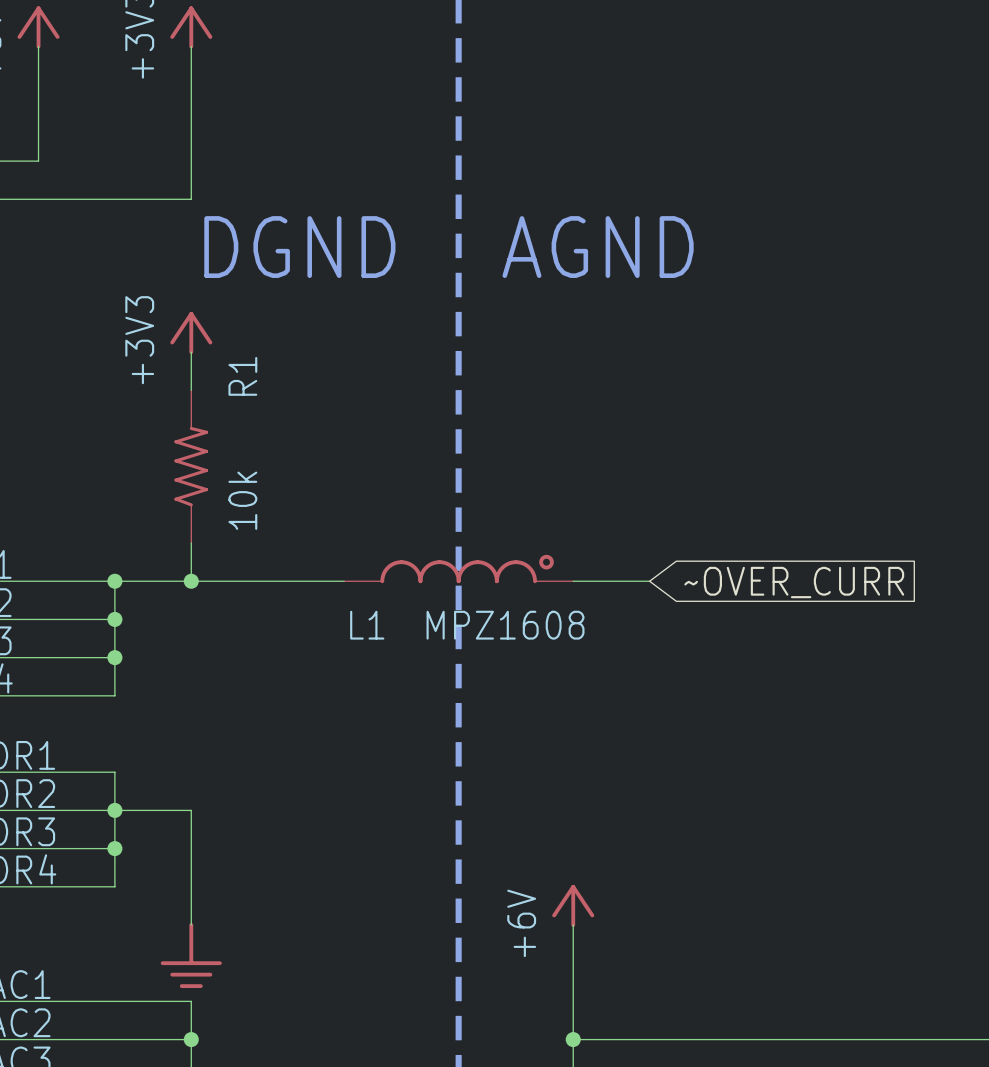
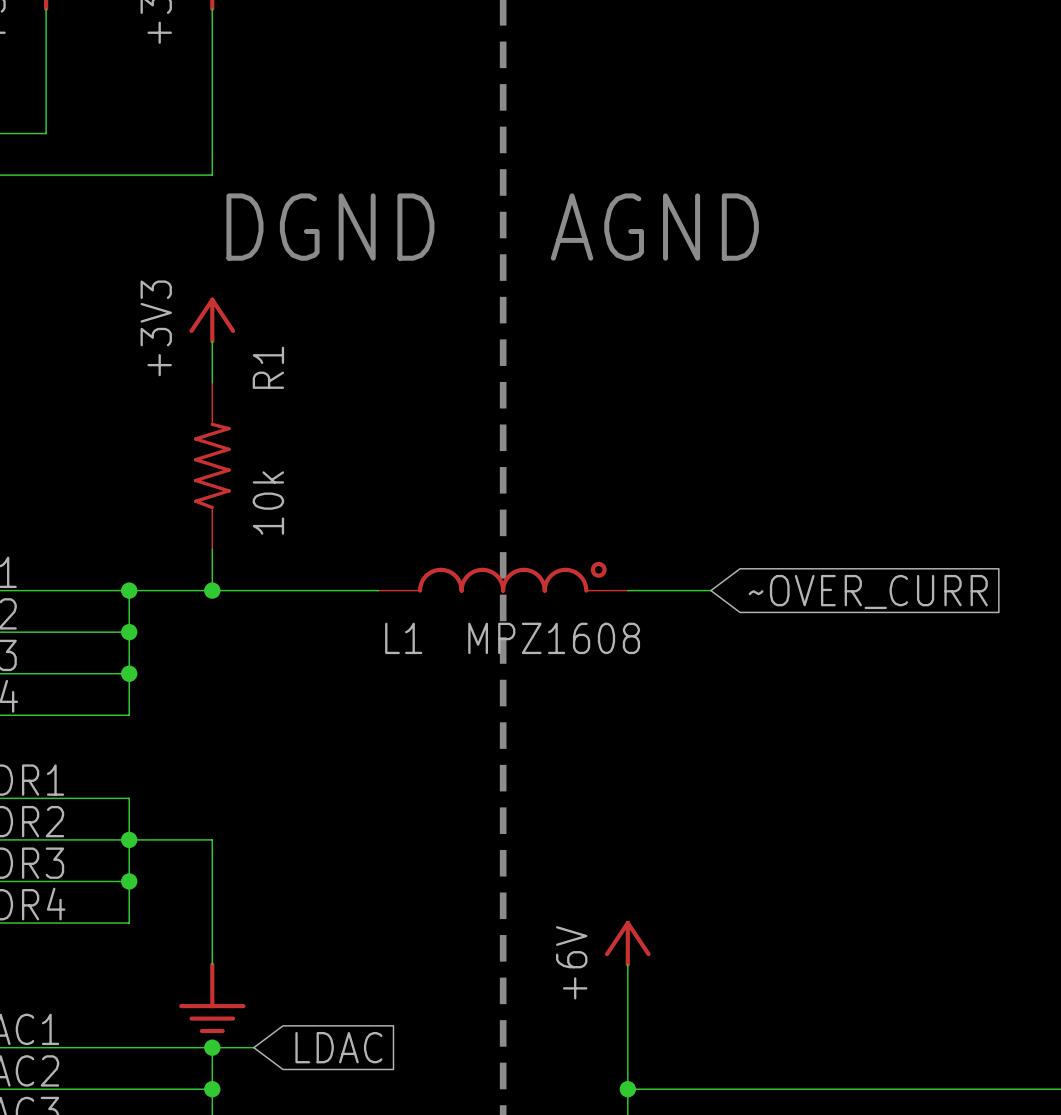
wire: none -> (212, 1047) (253, 1047)
junction: none -> (212, 1047)
global label: none -> LDAC (338, 1047)

